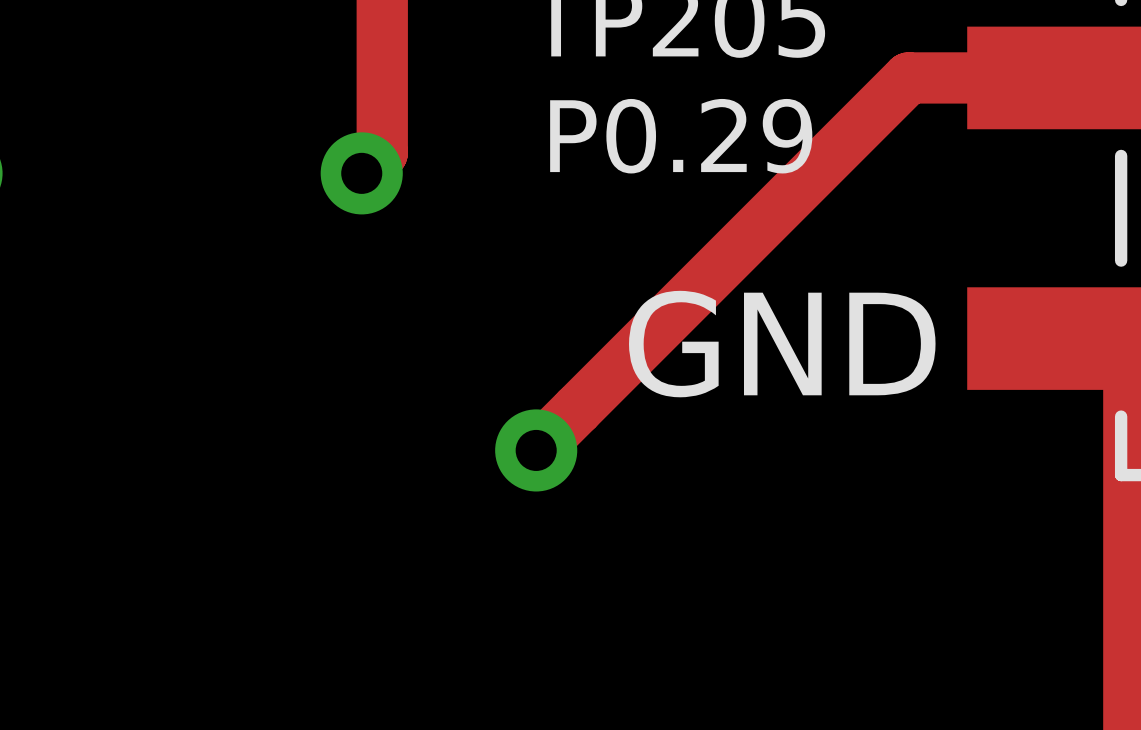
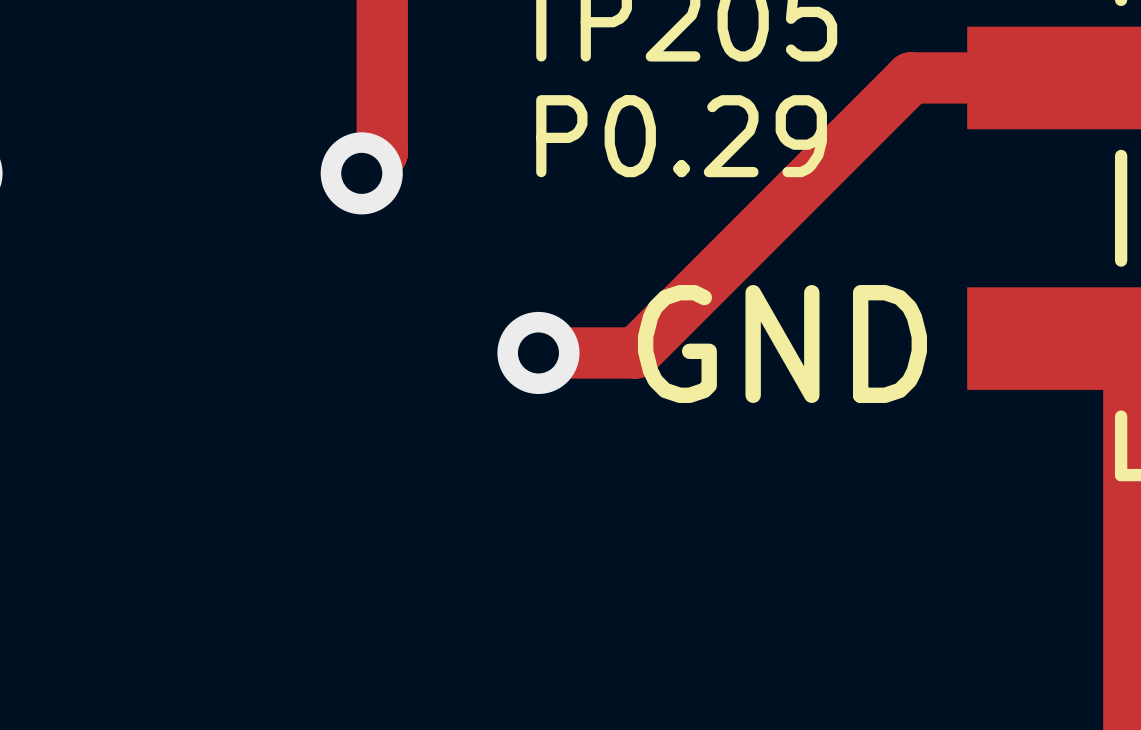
track: (910, 77) (908, 77) (536, 450) -> (910, 77) (635, 352) (538, 352)
via position: (536, 450) -> (538, 352)

